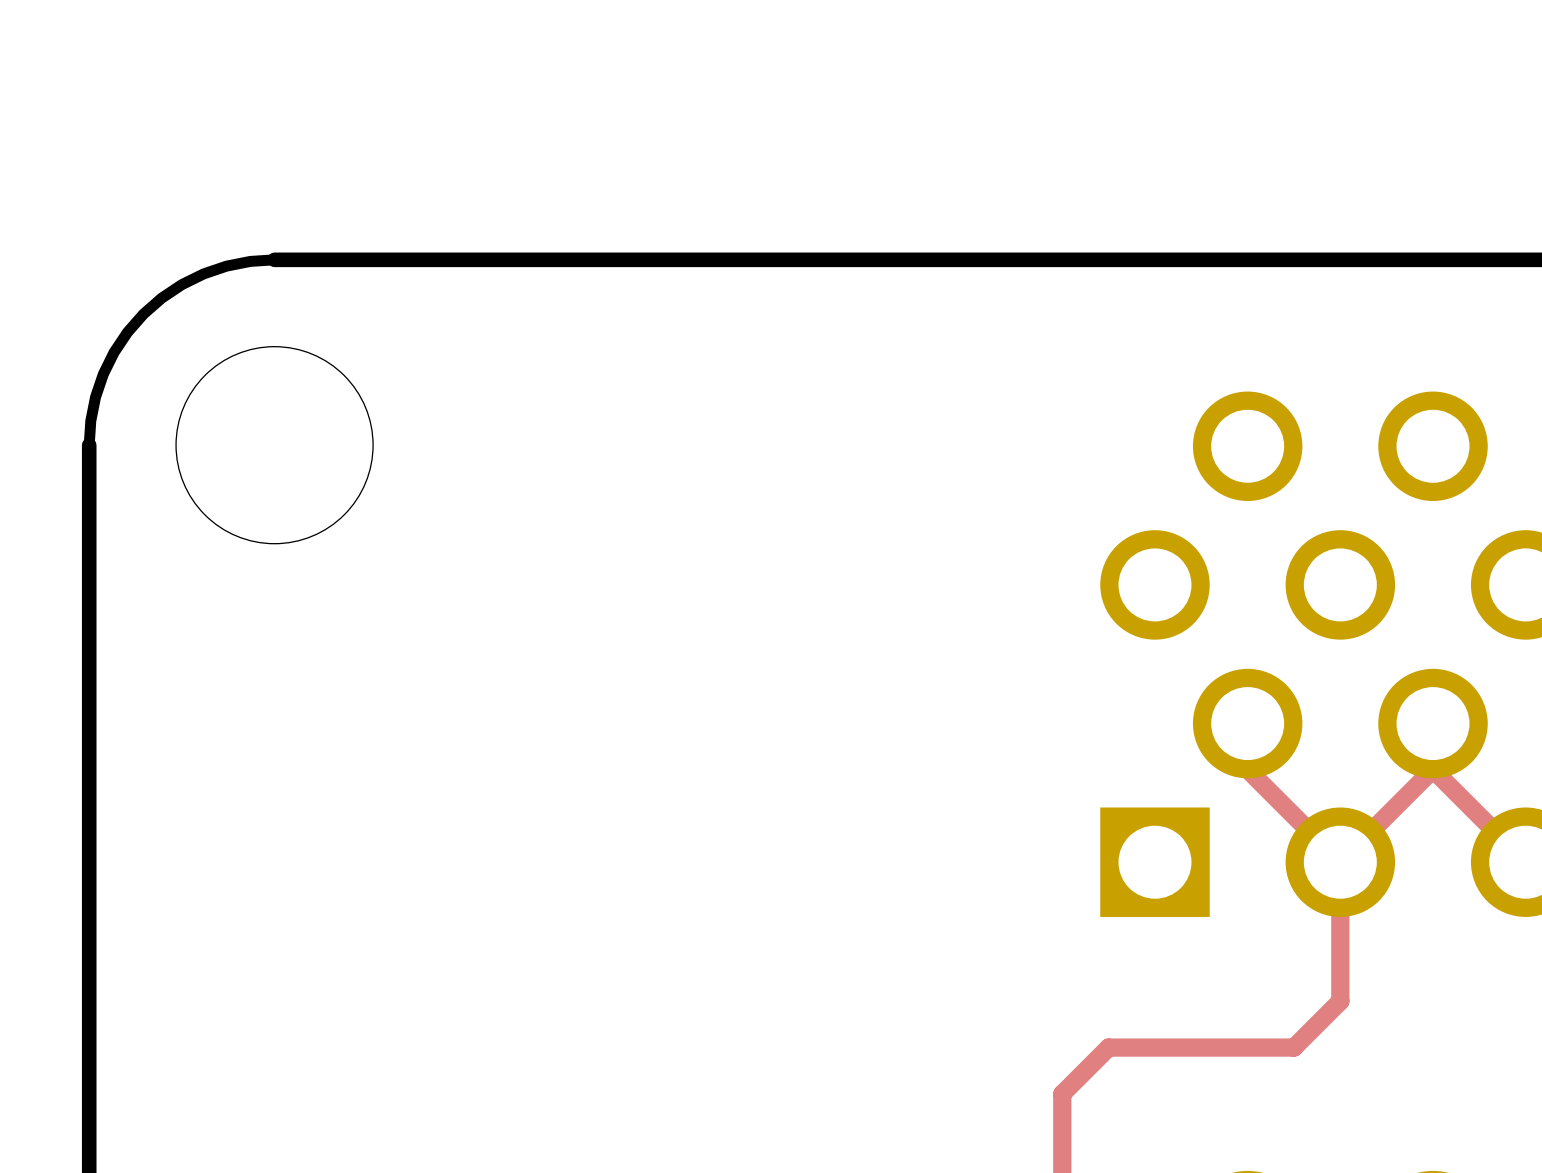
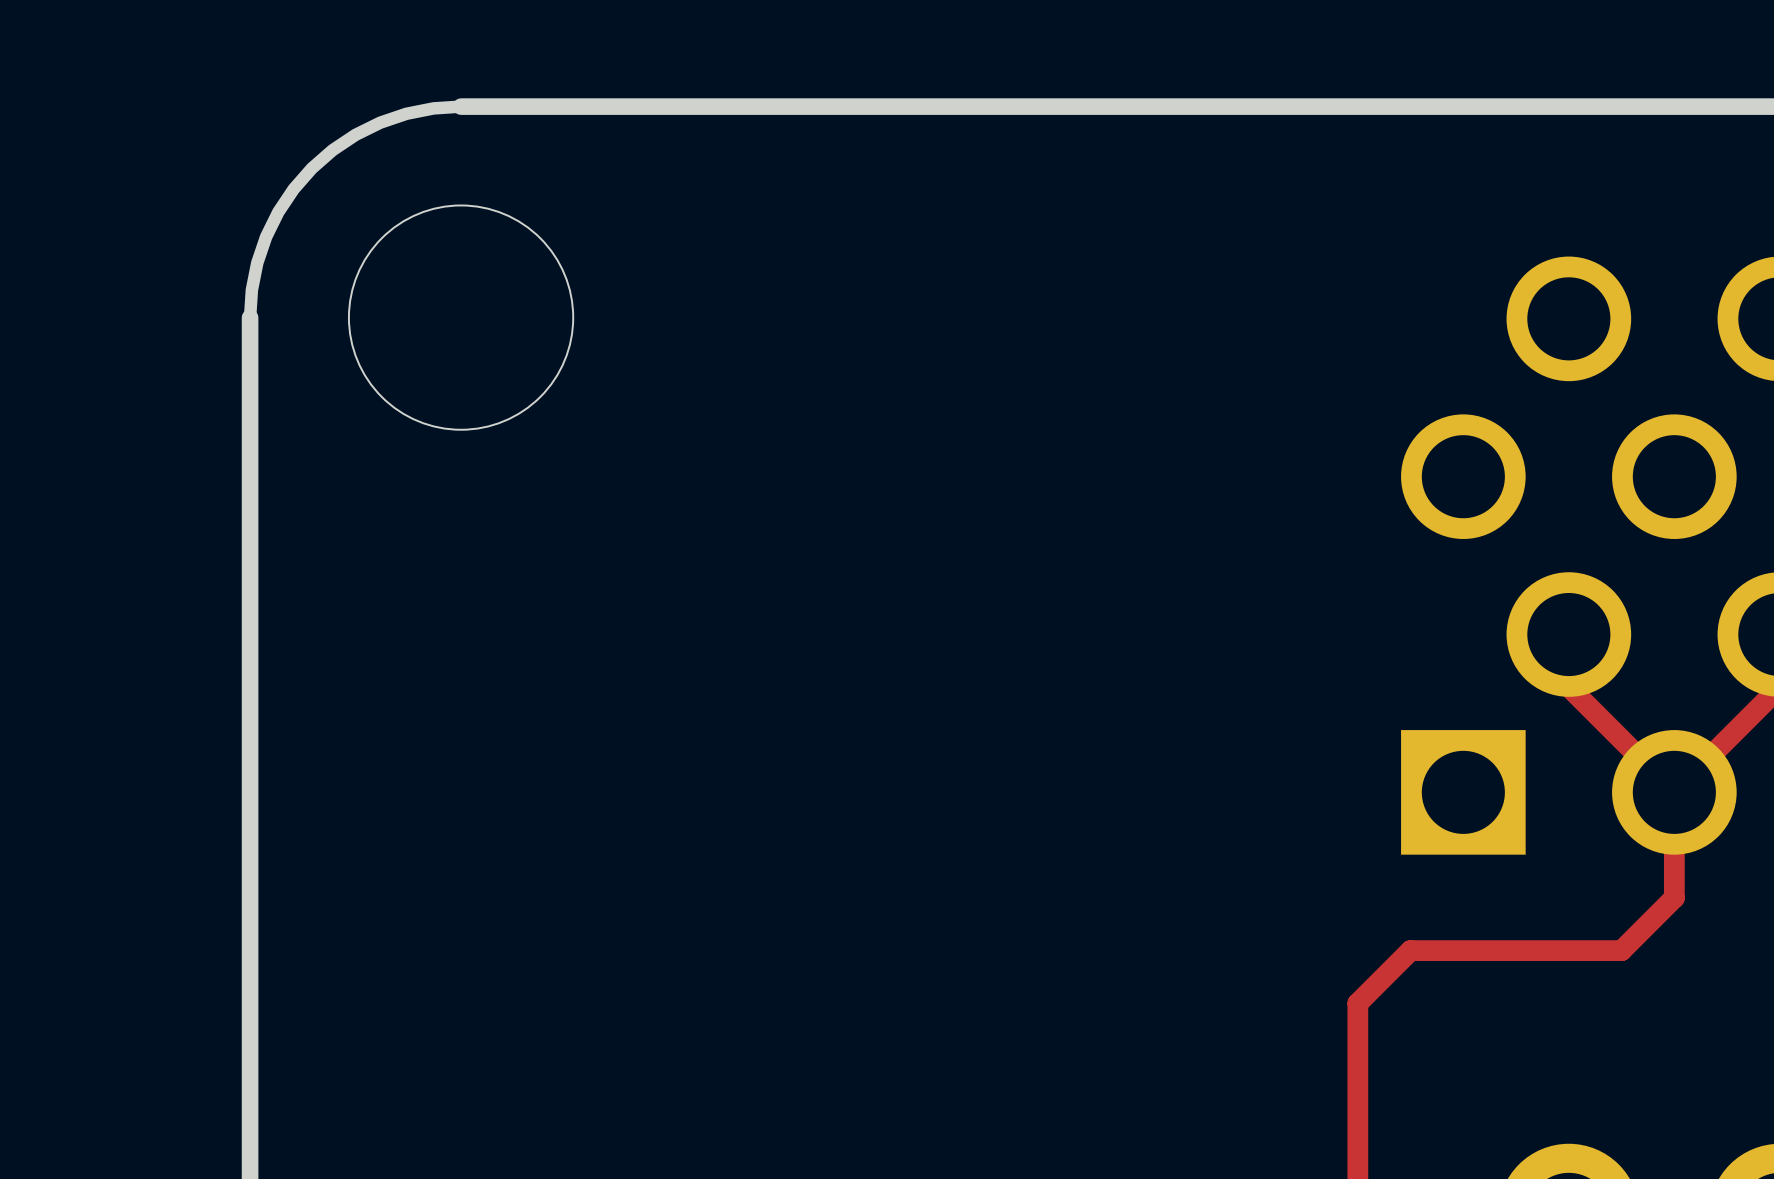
track: (1340, 954) (1340, 1001) (1293, 1047) (1108, 1047) (1062, 1093) -> (1674, 897) (1621, 950) (1410, 950) (1357, 1003) (1357, 1056)

